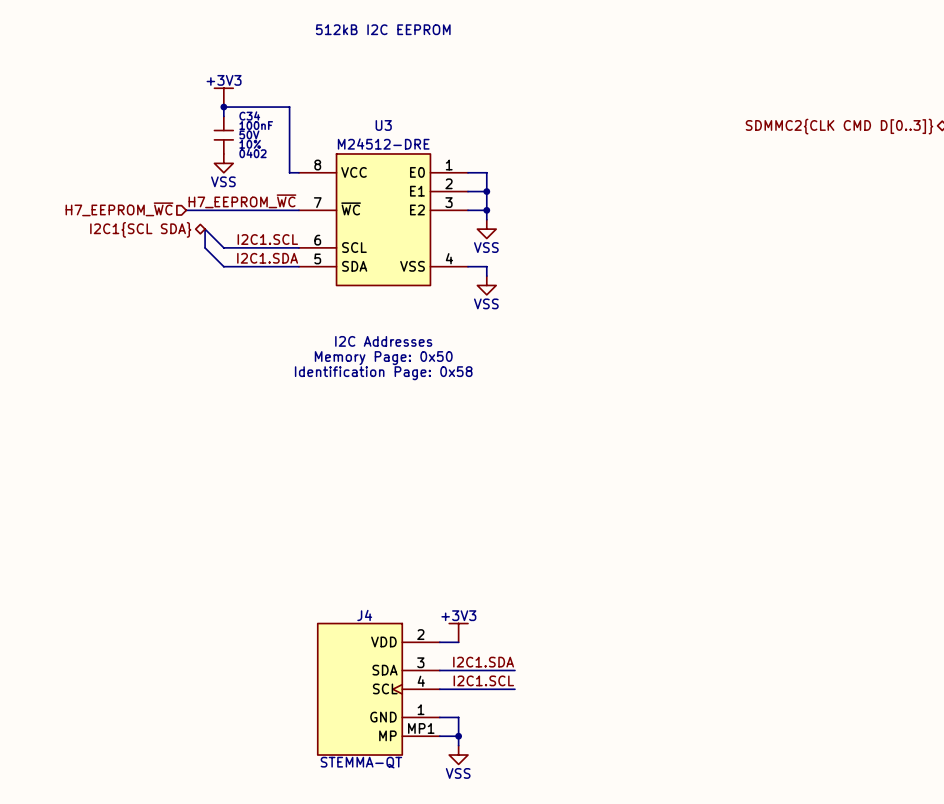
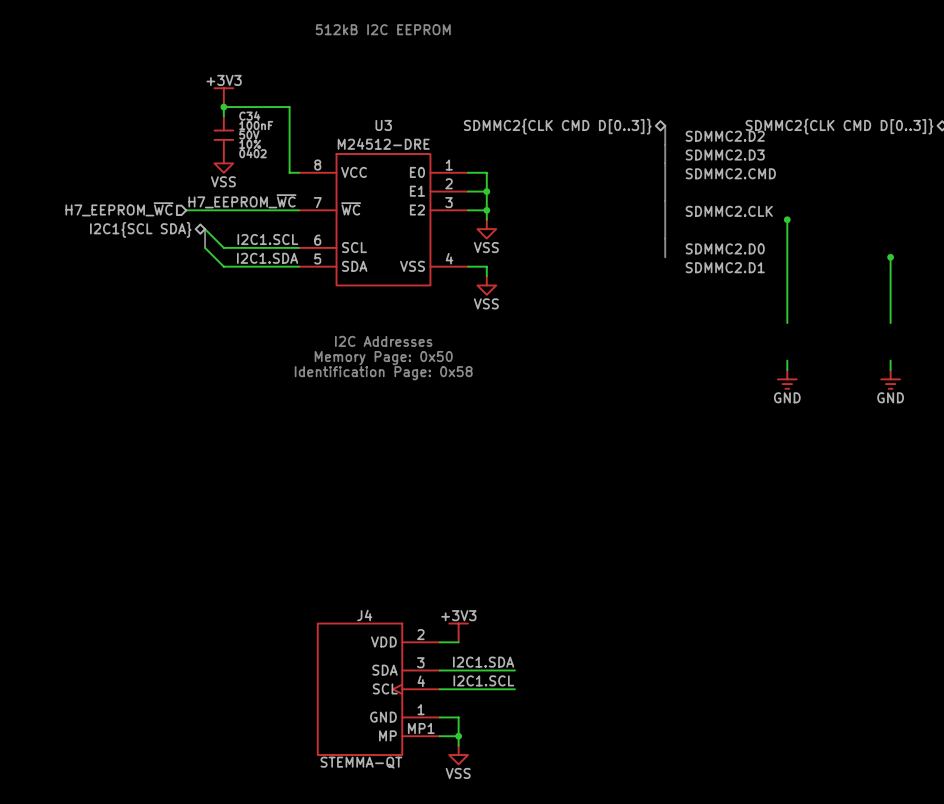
bus: none -> (665, 125) (665, 257)
hierarchical label: none -> SDMMC2{CLK CMD D[0..3]} (557, 126)
label: none -> SDMMC2.D2 (725, 136)
label: none -> SDMMC2.D3 (725, 155)
label: none -> SDMMC2.CMD (730, 173)
label: none -> SDMMC2.CLK (729, 211)
wire: none -> (787, 219) (787, 323)
junction: none -> (787, 219)
label: none -> SDMMC2.D0 (725, 248)
wire: none -> (890, 257) (890, 323)
junction: none -> (890, 257)
label: none -> SDMMC2.D1 (725, 267)
wire: none -> (787, 360) (787, 369)
wire: none -> (890, 360) (890, 369)
power symbol: none -> GND (787, 379)
power symbol: none -> GND (890, 379)

